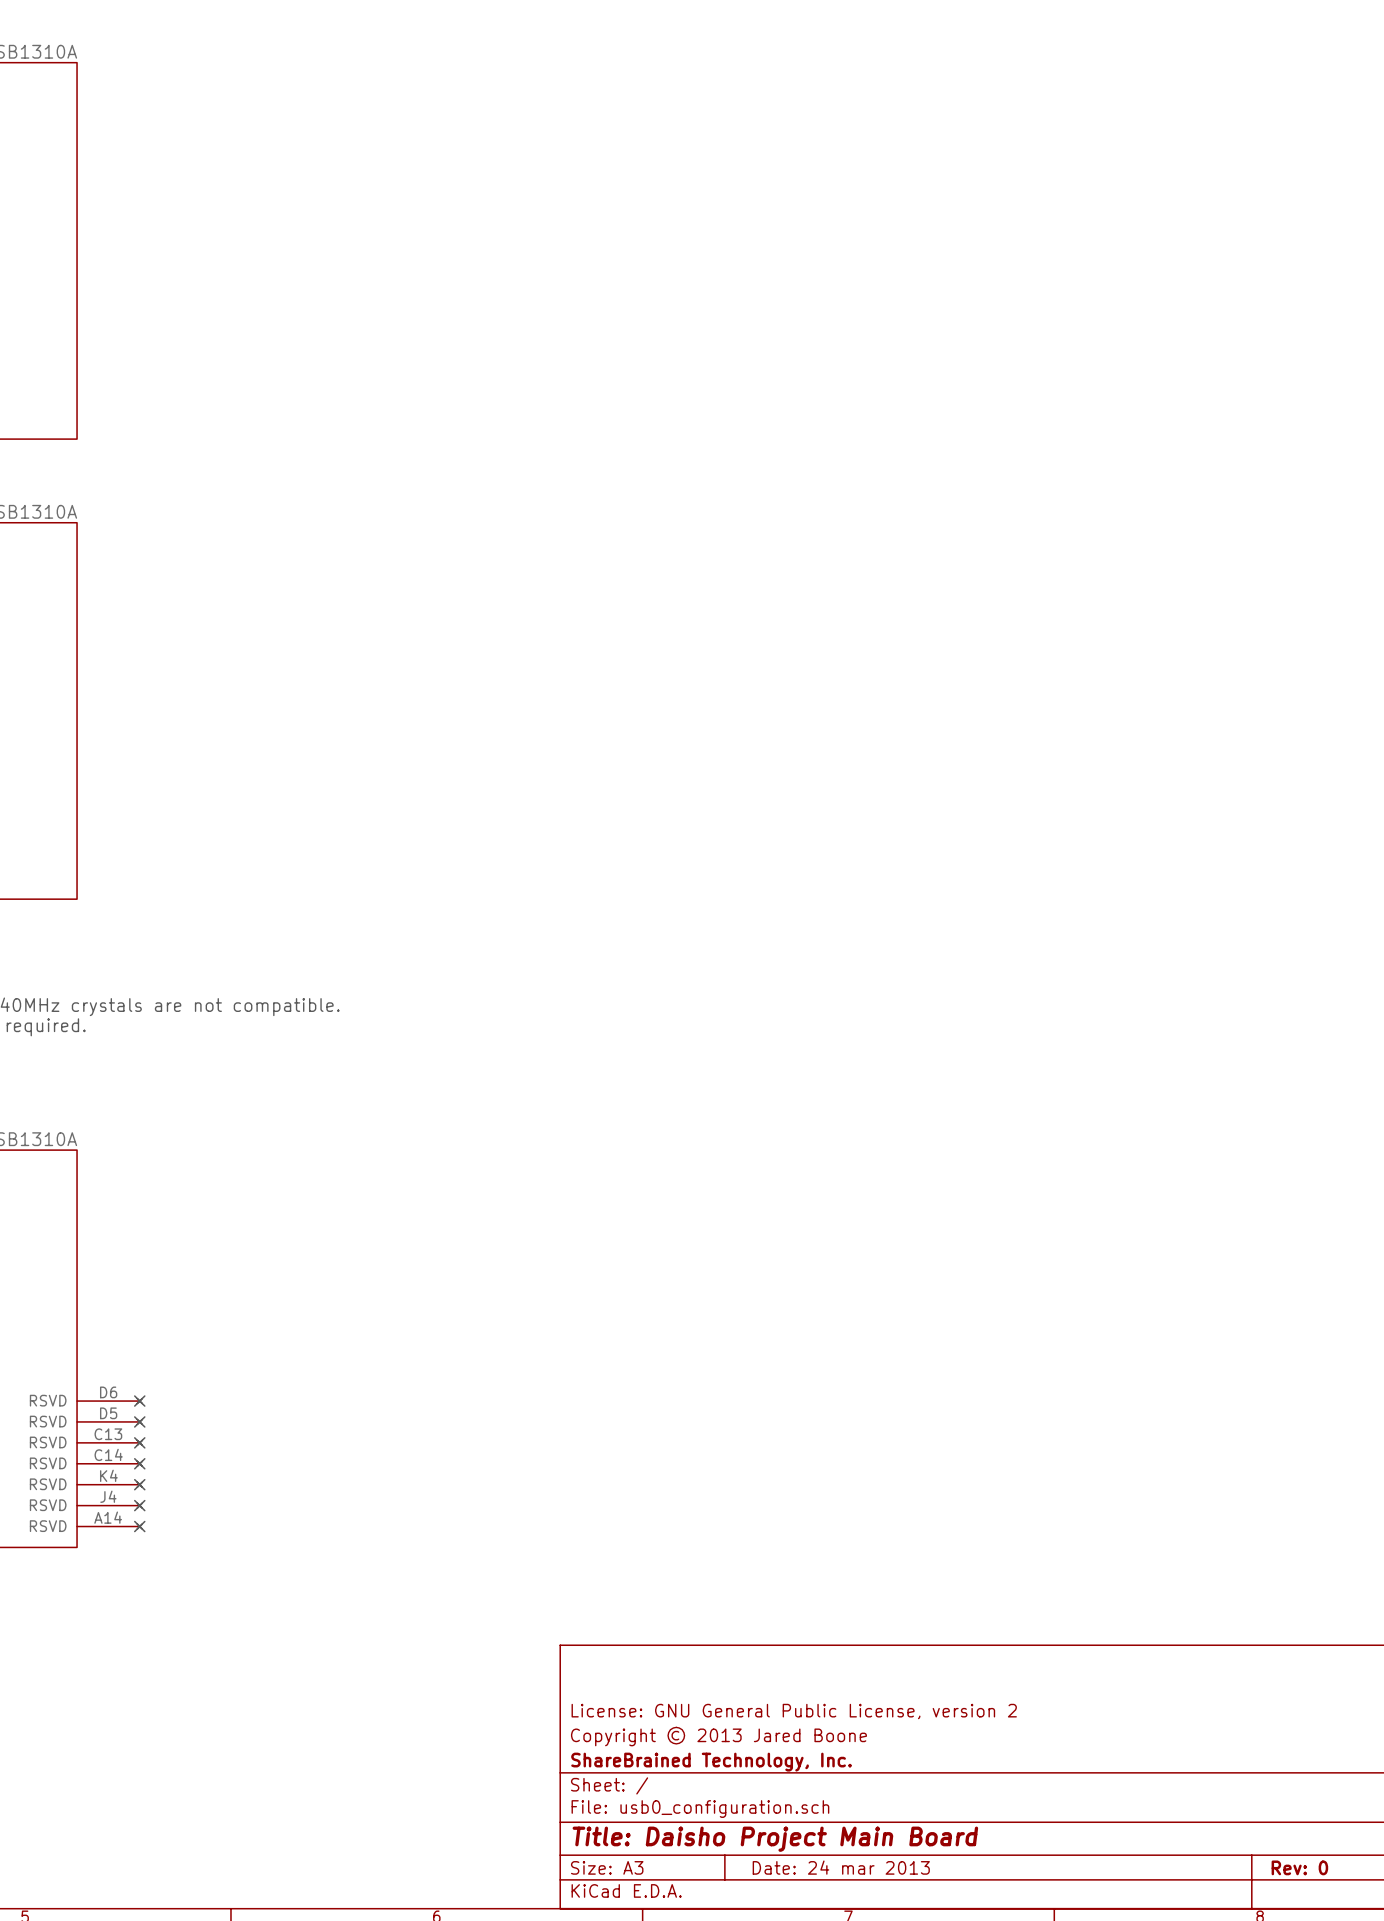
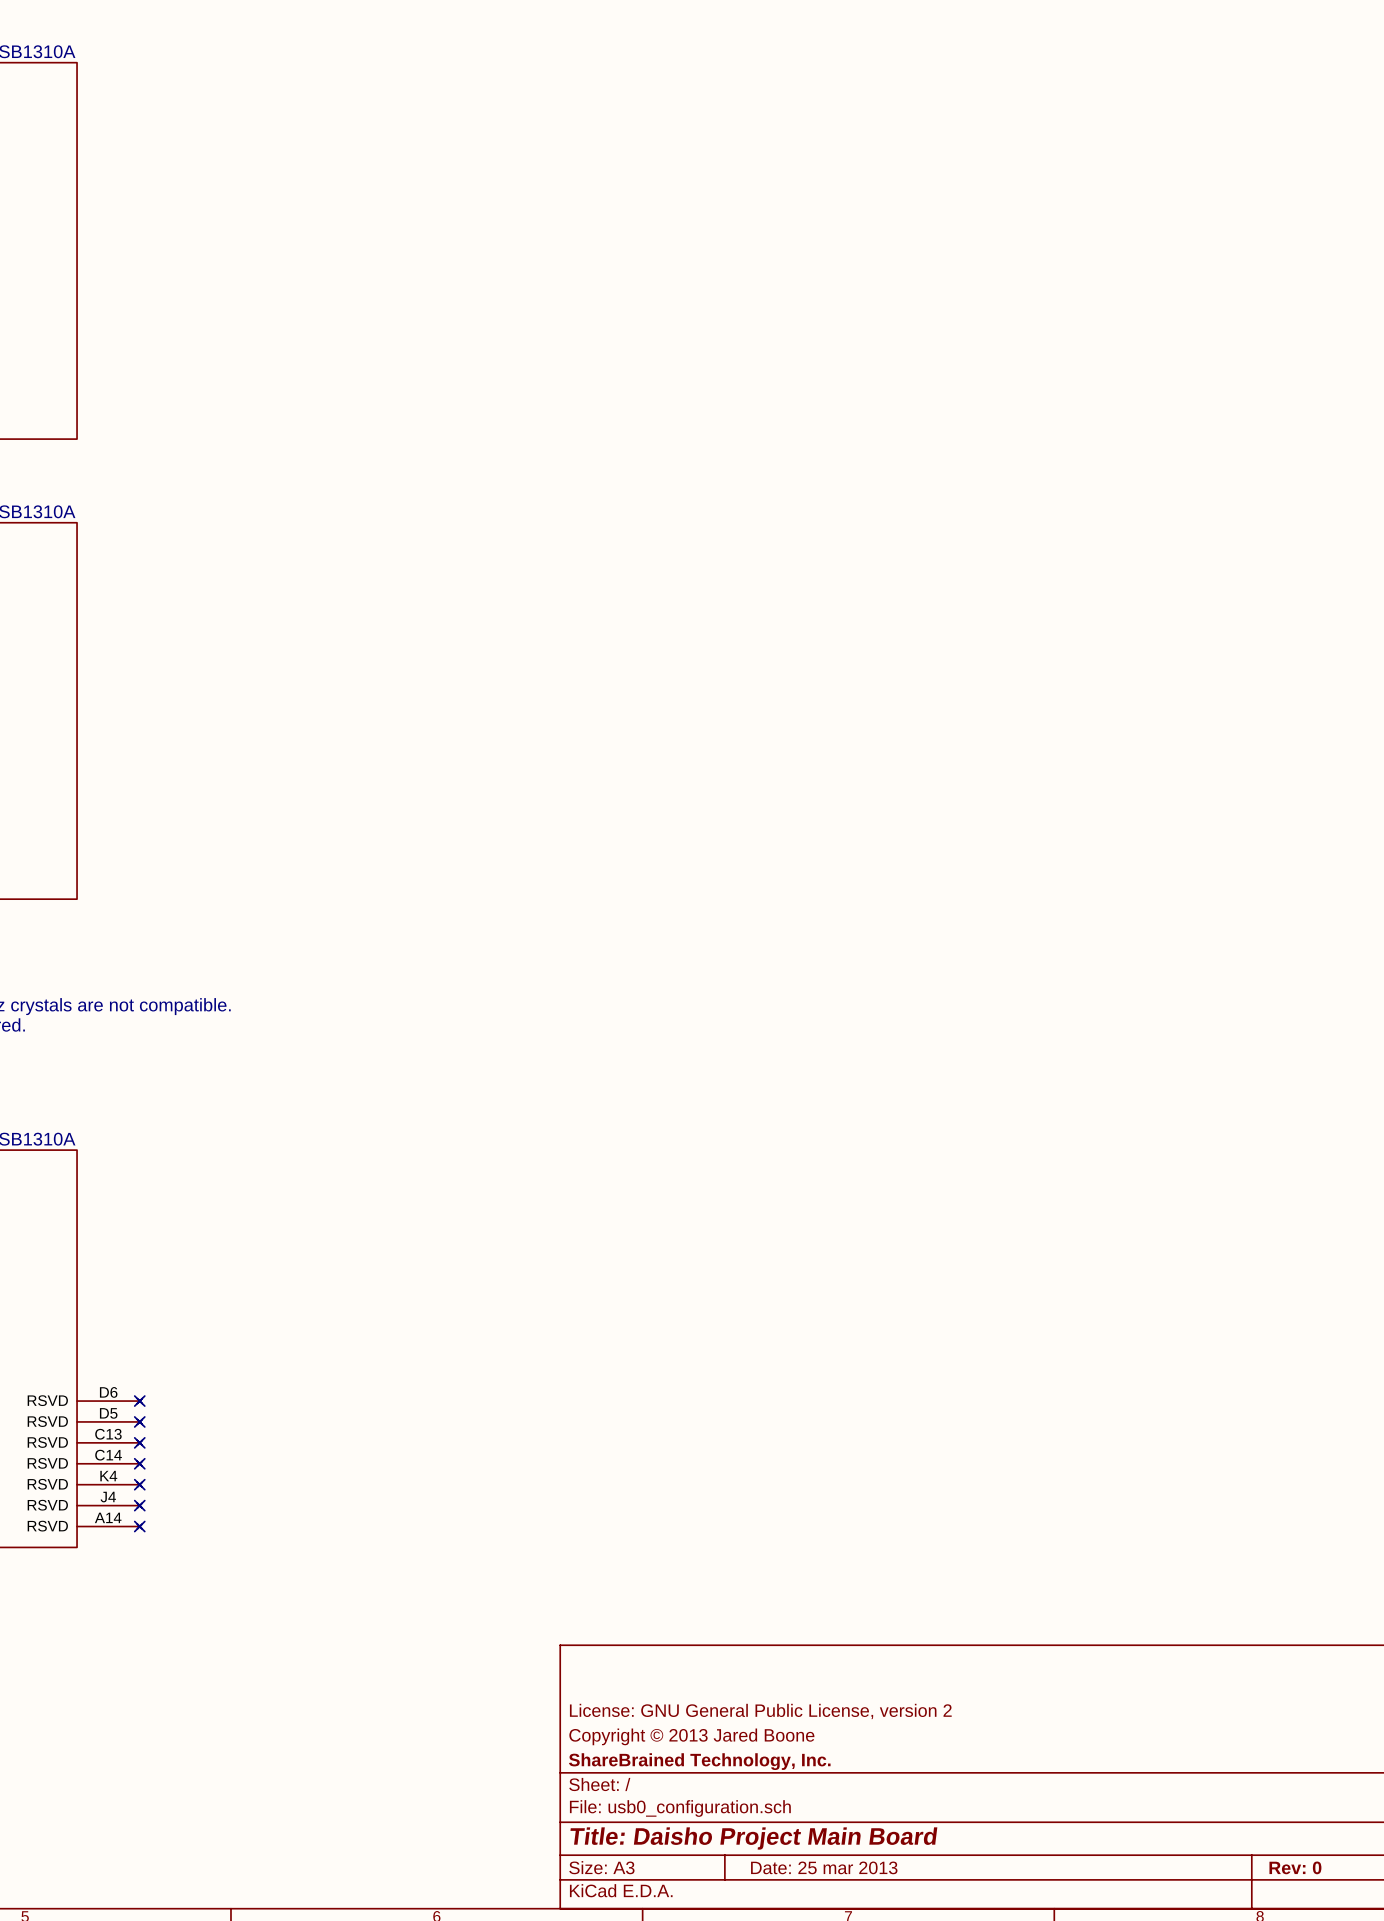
title block: Date: 24 mar 2013 (841, 1867) -> Date: 25 mar 2013 (824, 1867)

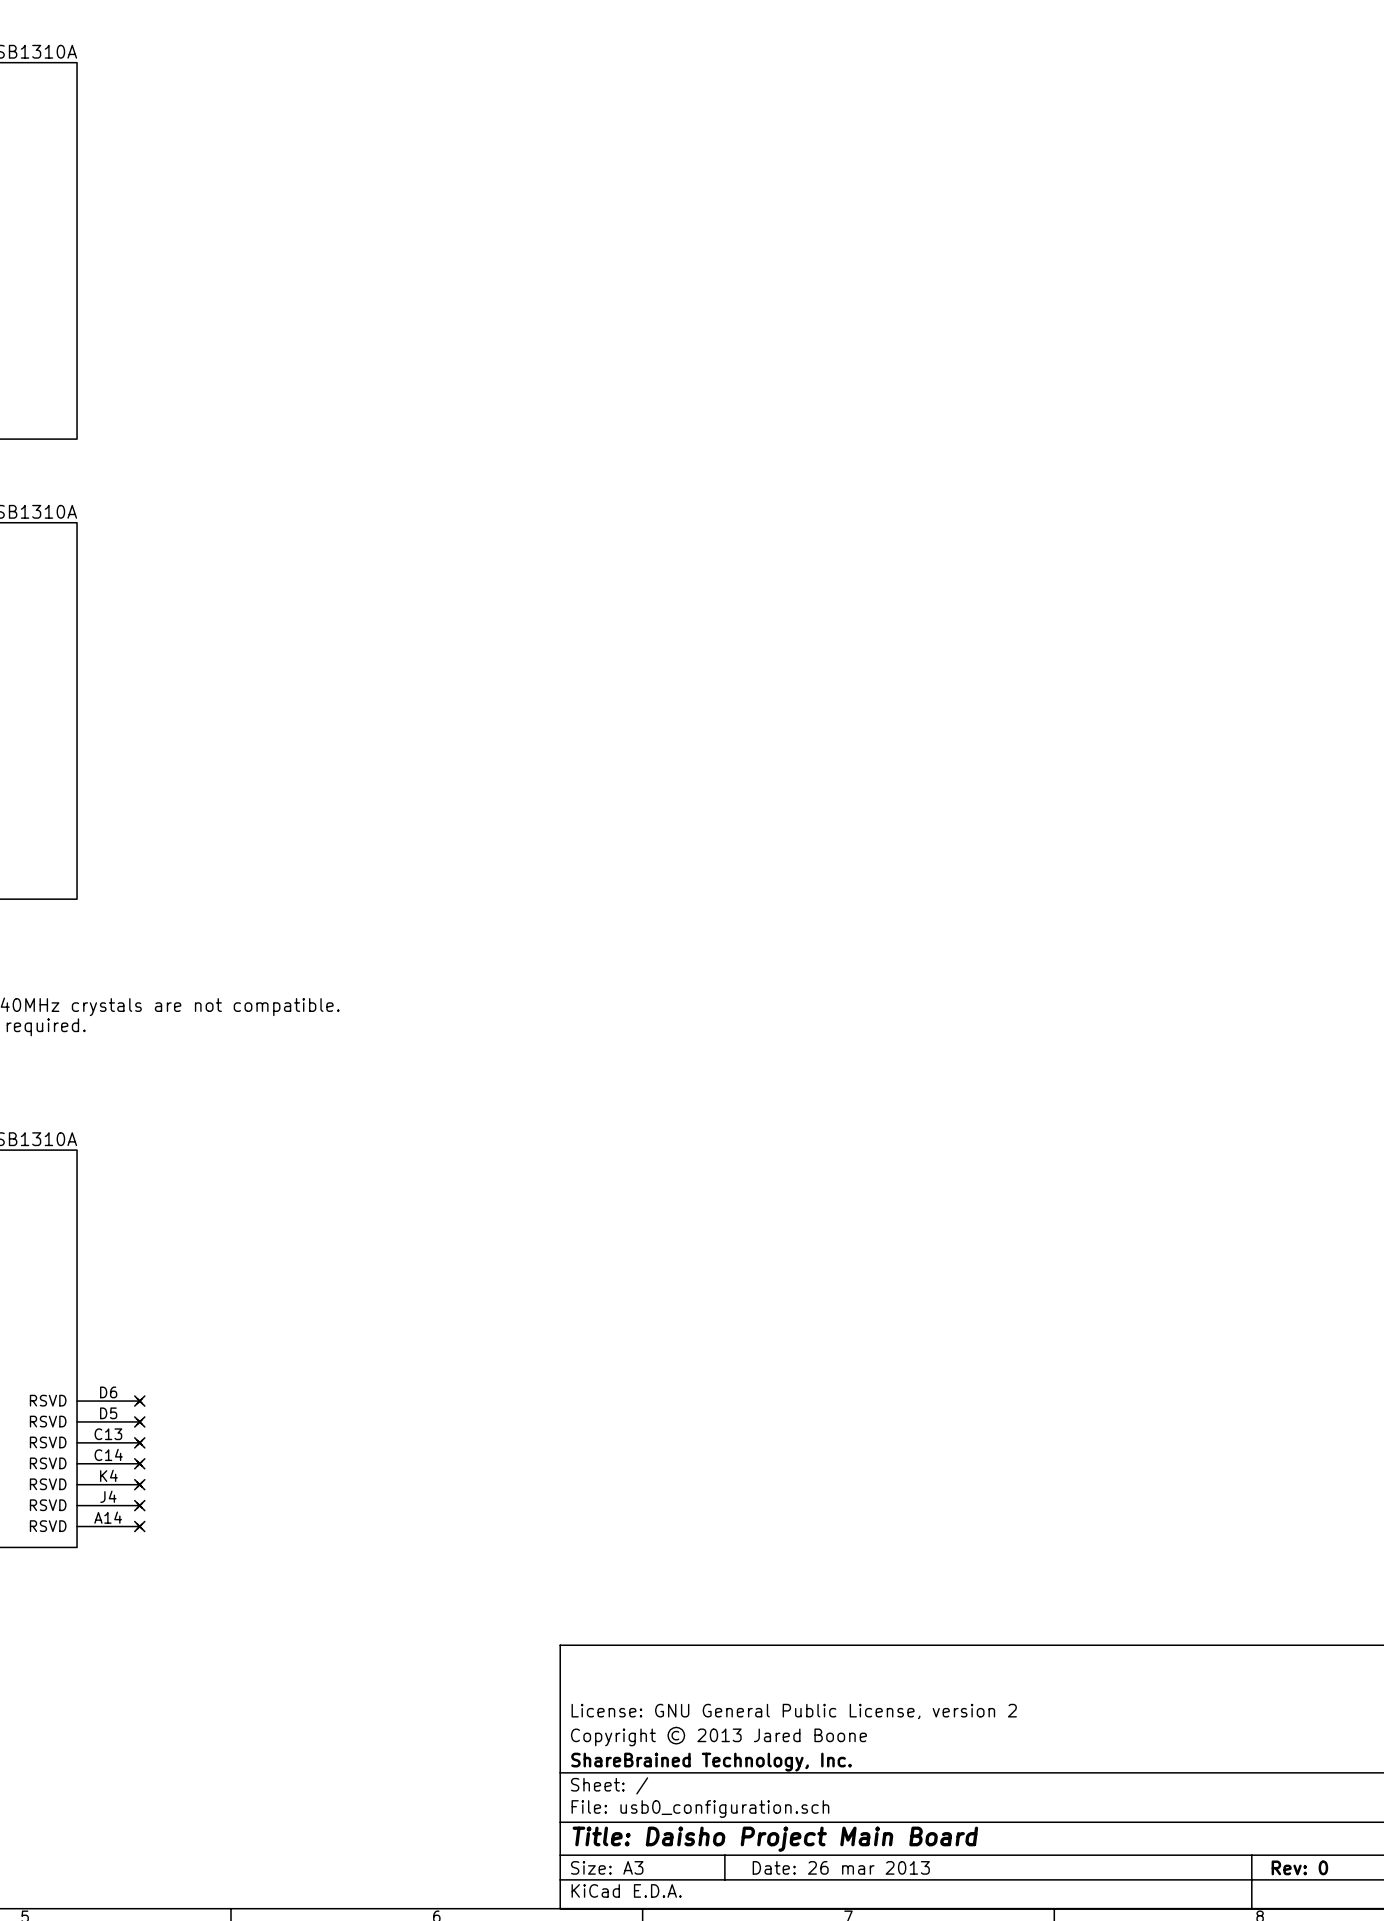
title block: Date: 25 mar 2013 (824, 1867) -> Date: 26 mar 2013 (841, 1867)

